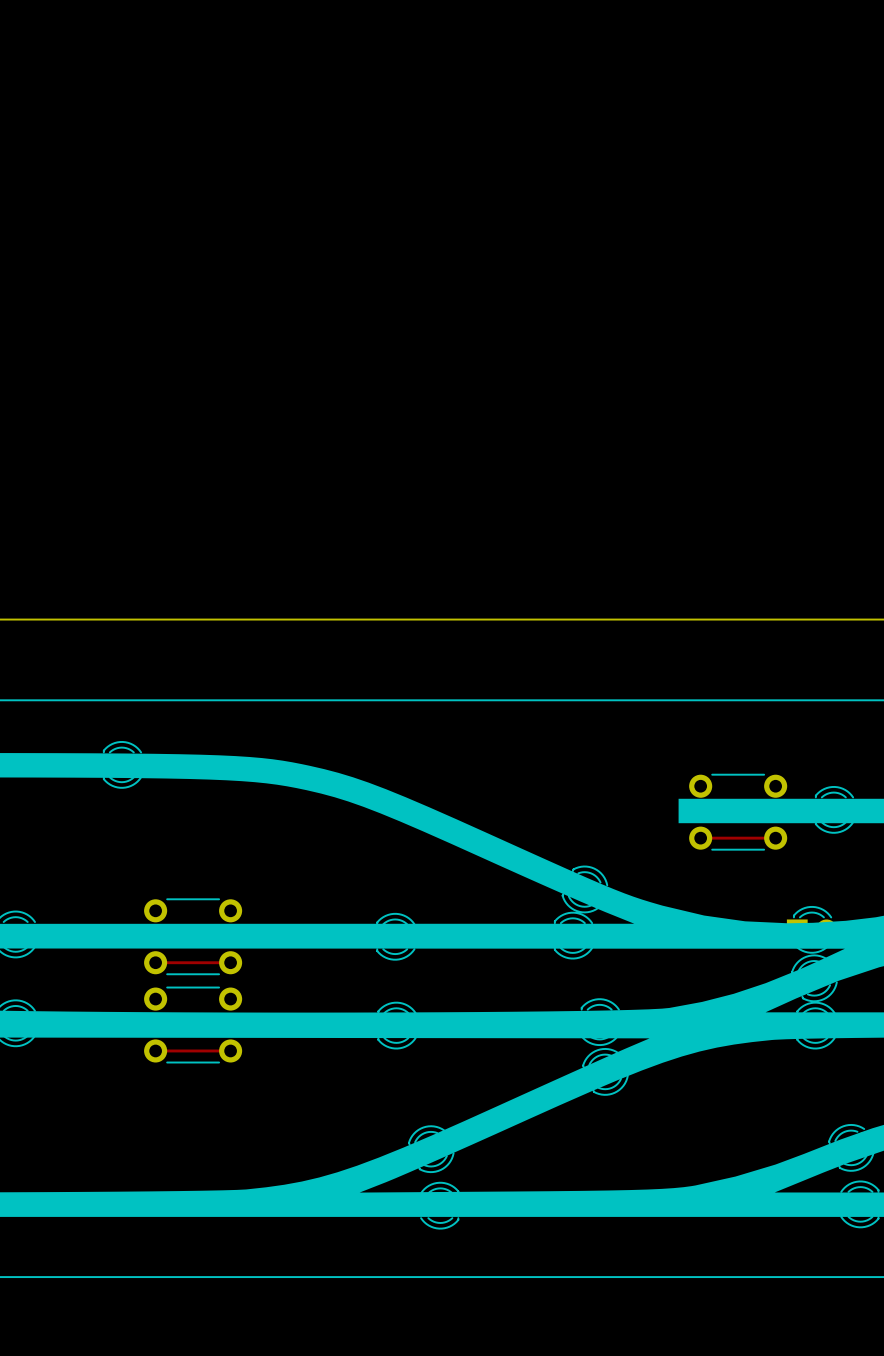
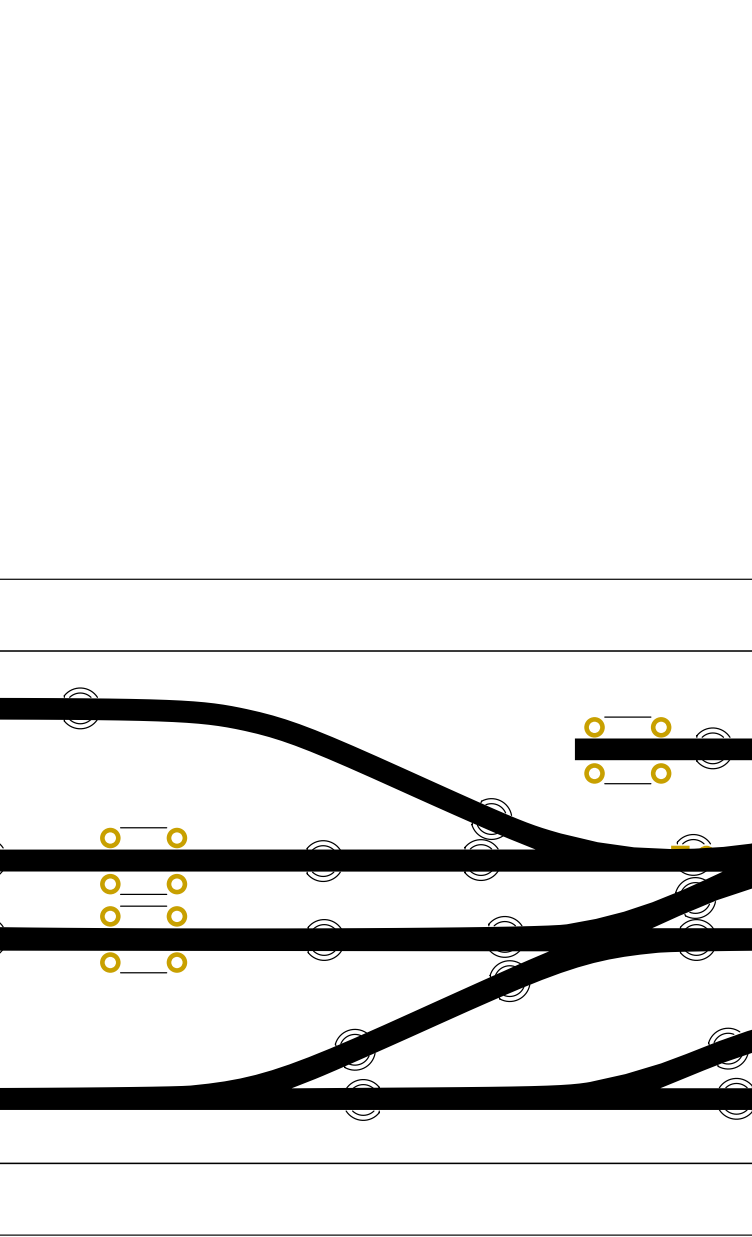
track: (700, 838) (775, 838) -> none
track: (155, 962) (230, 962) -> none
track: (155, 1050) (230, 1050) -> none

